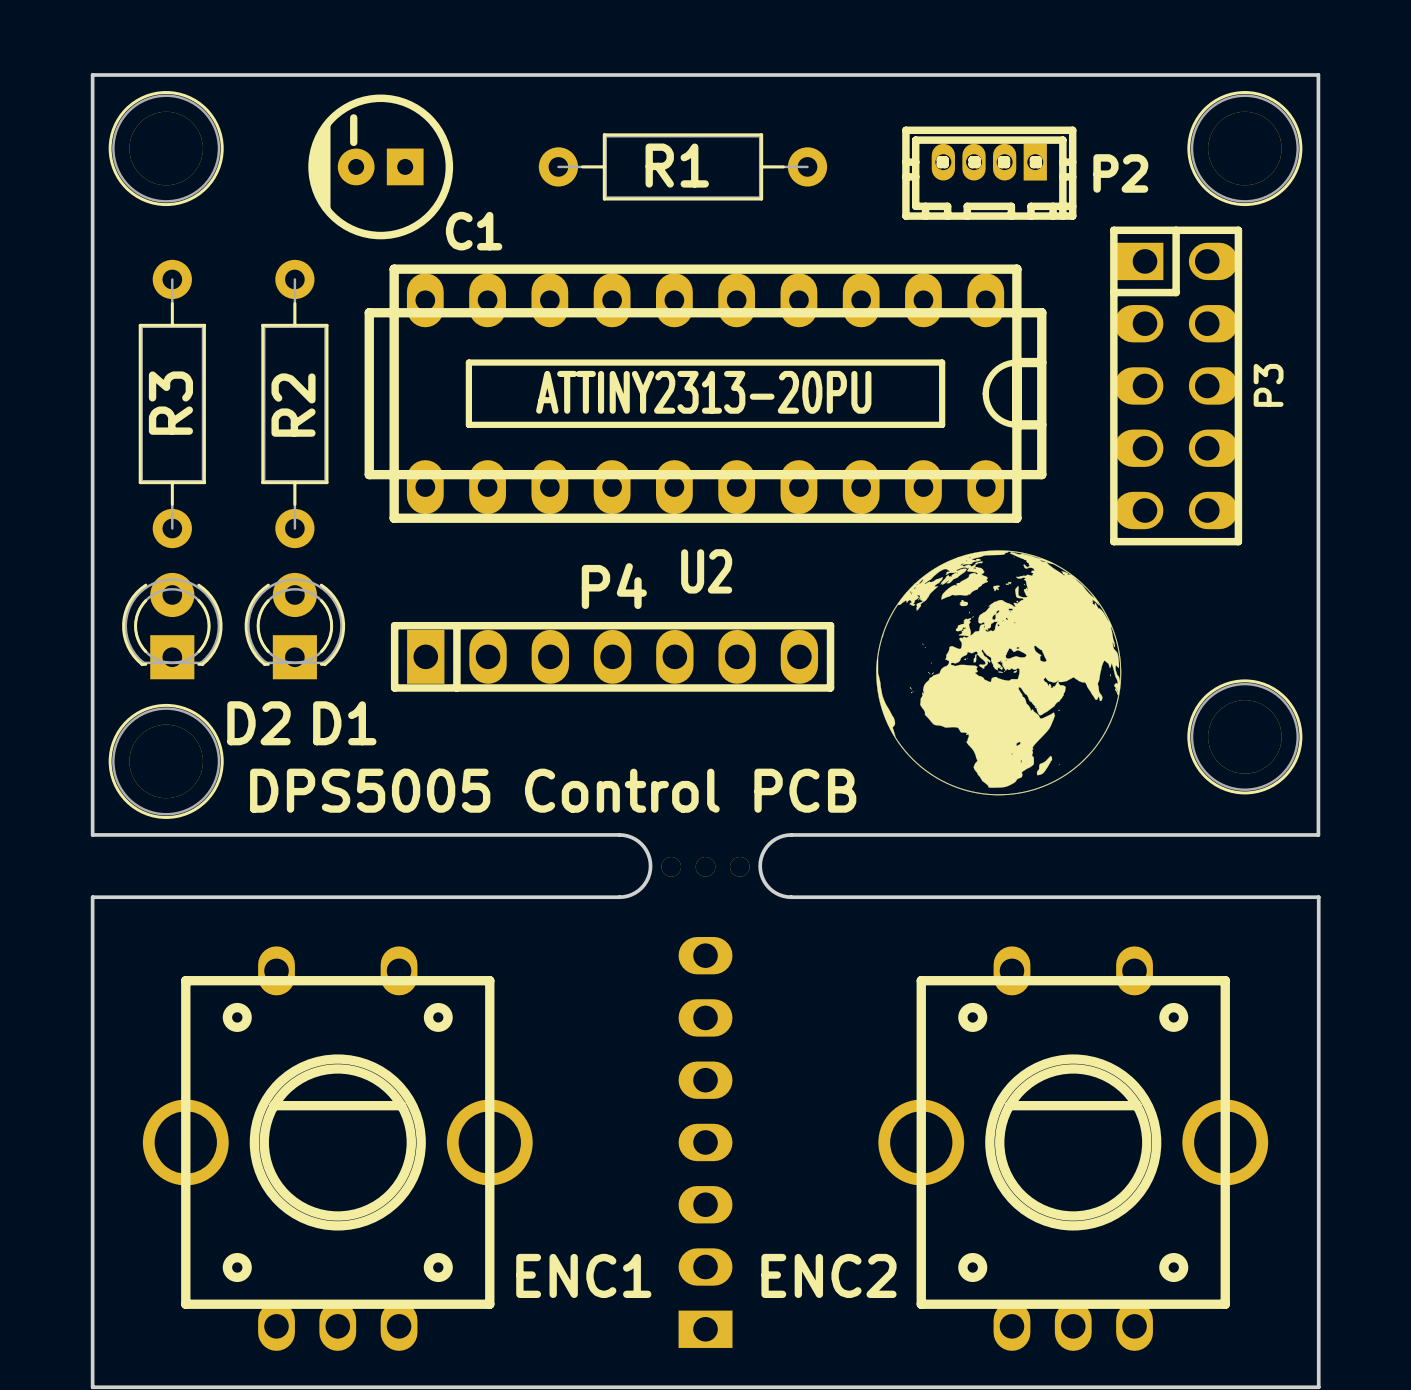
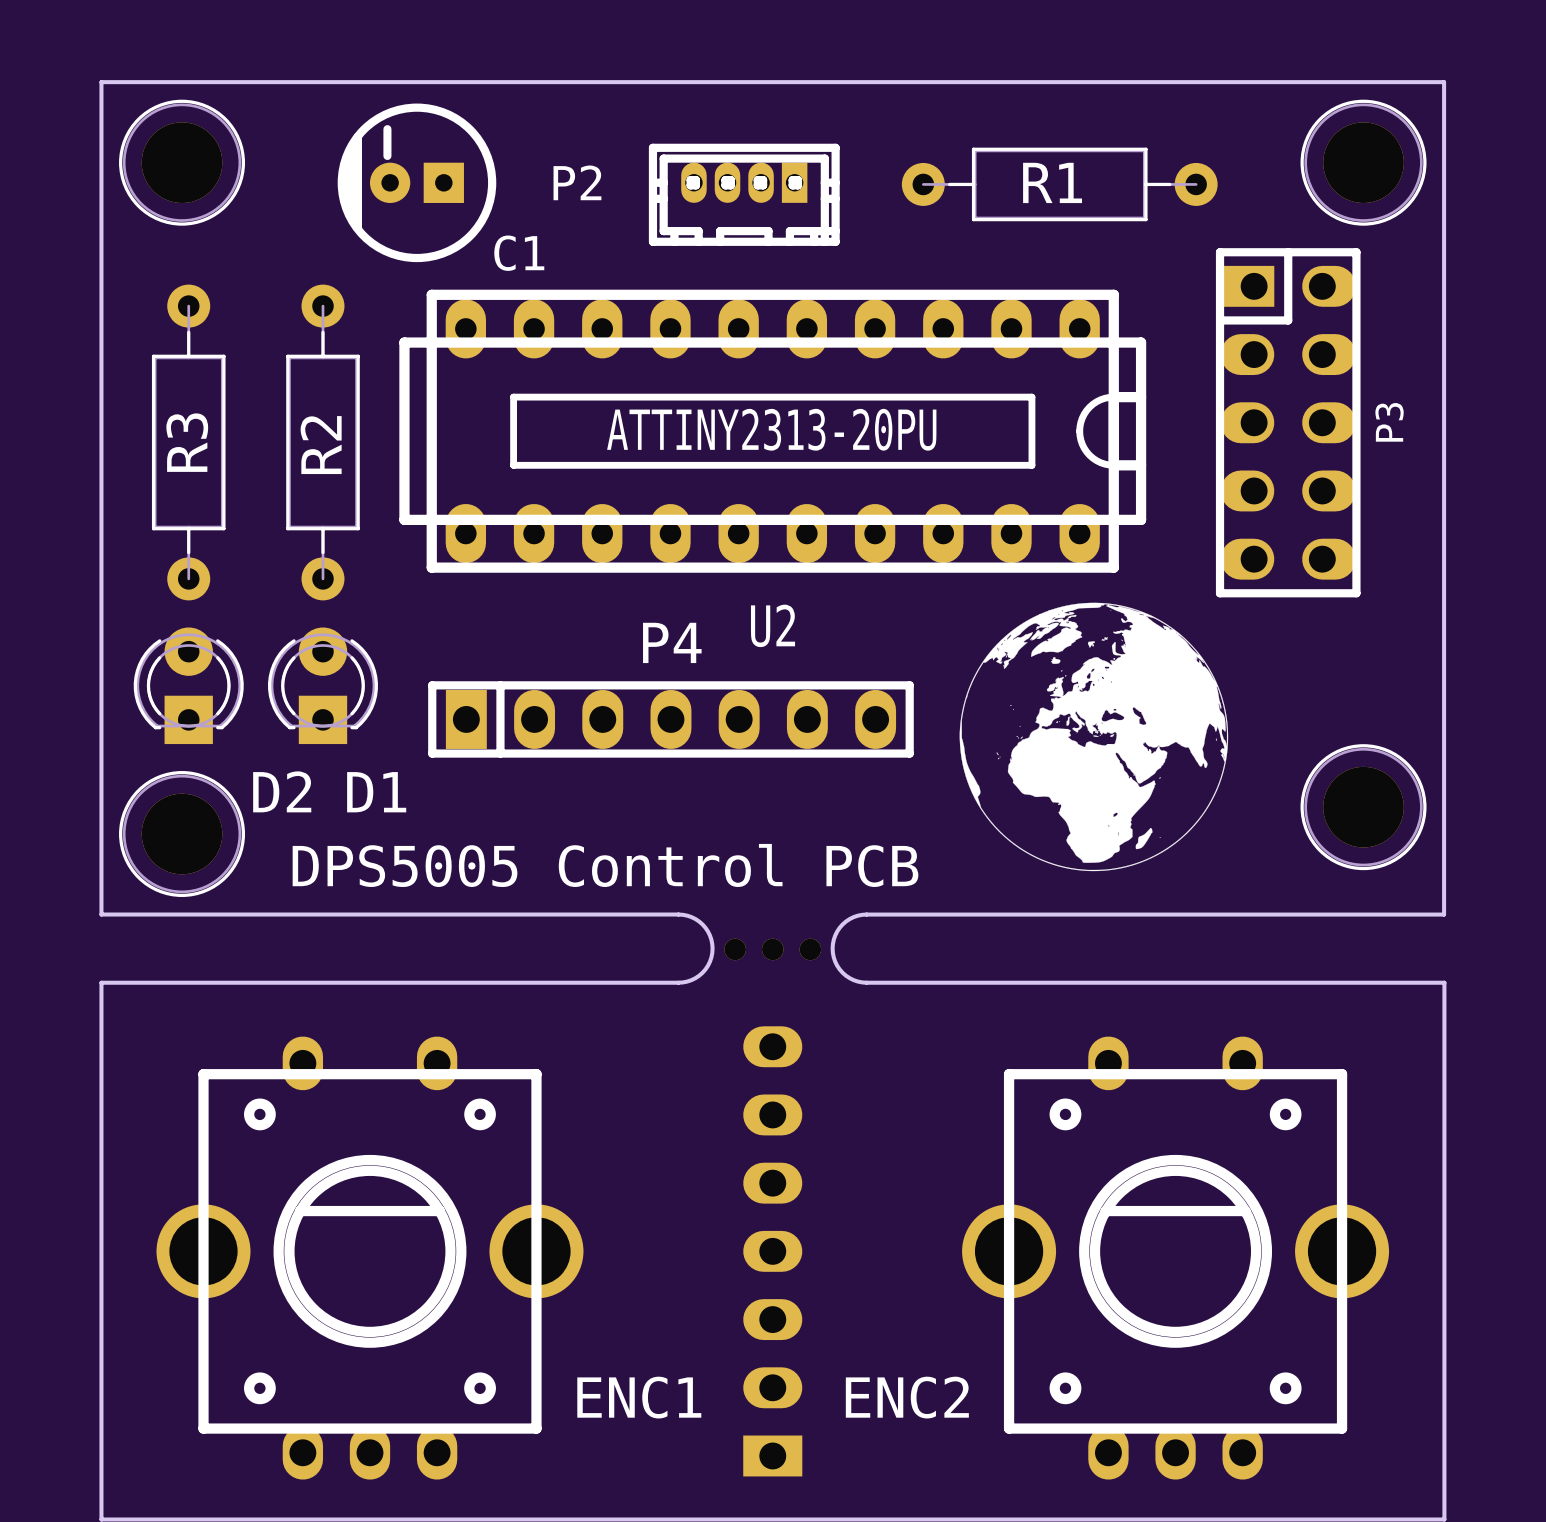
R1 position: (682, 166) -> (1059, 184)
P2 position: (989, 173) -> (744, 194)
P2 name position: P2 (1120, 173) -> P2 (577, 182)

